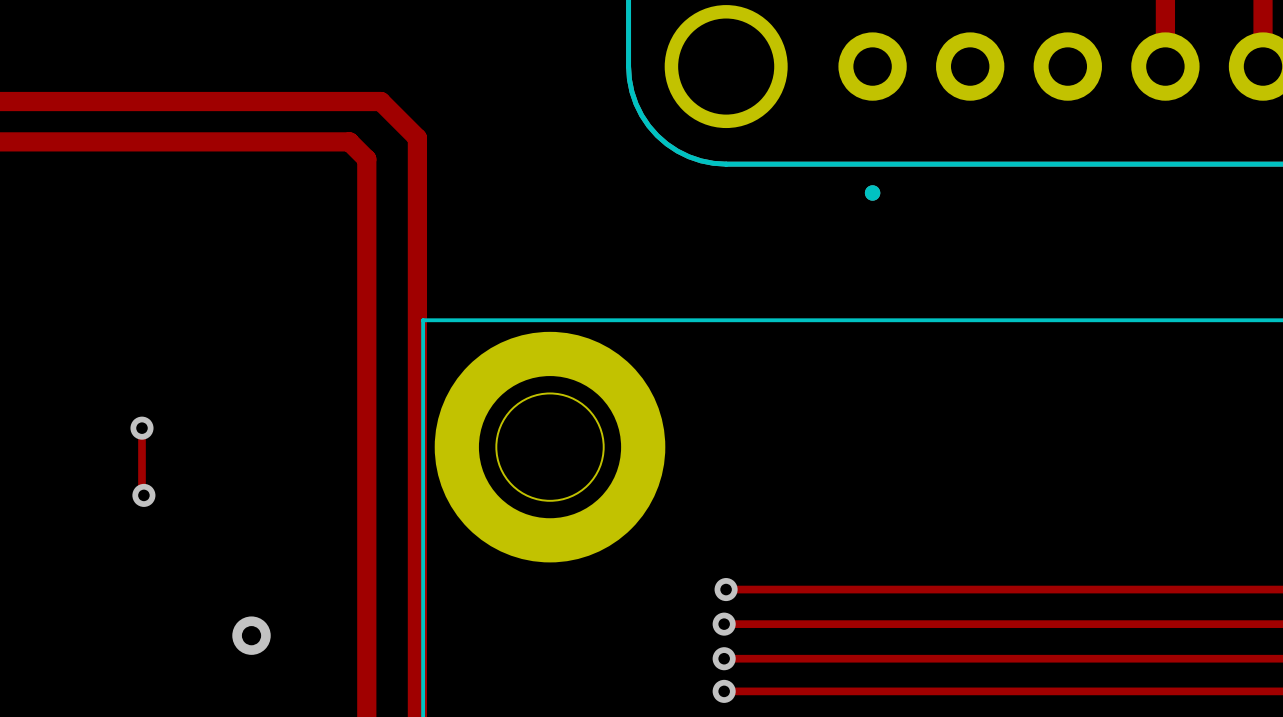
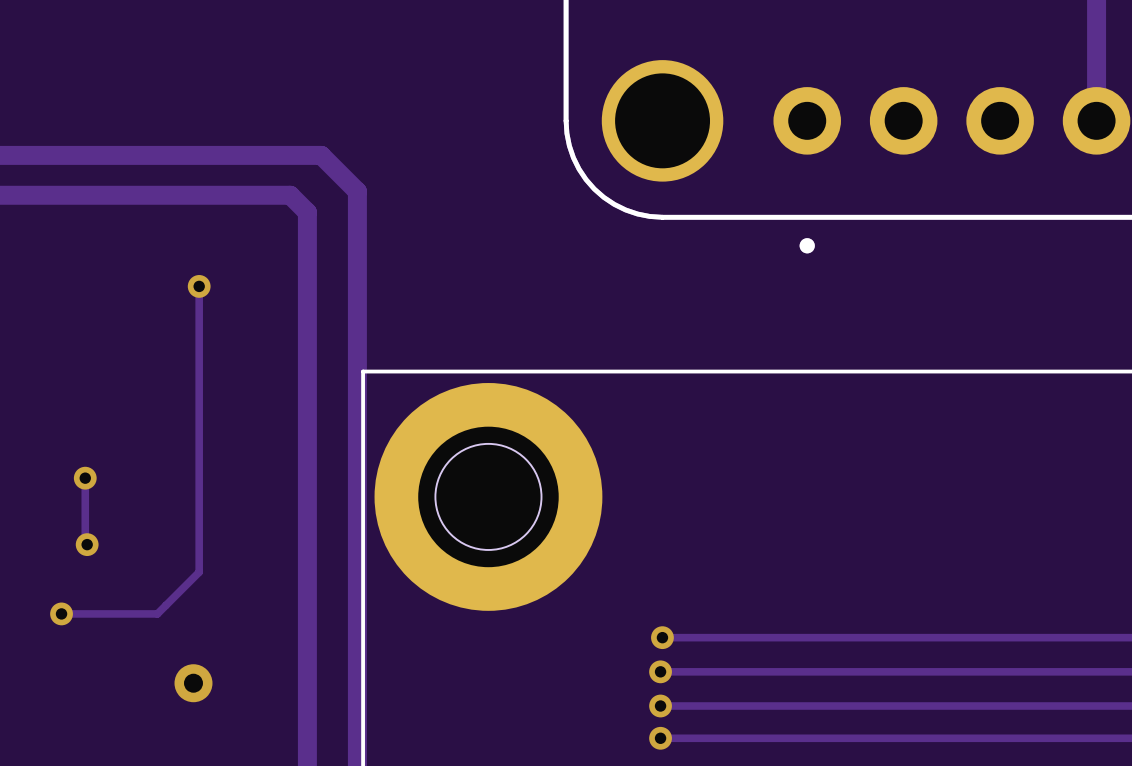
track: none -> (199, 286) (199, 572) (157, 613) (61, 613)
via: none -> (199, 286)
via: none -> (61, 613)

